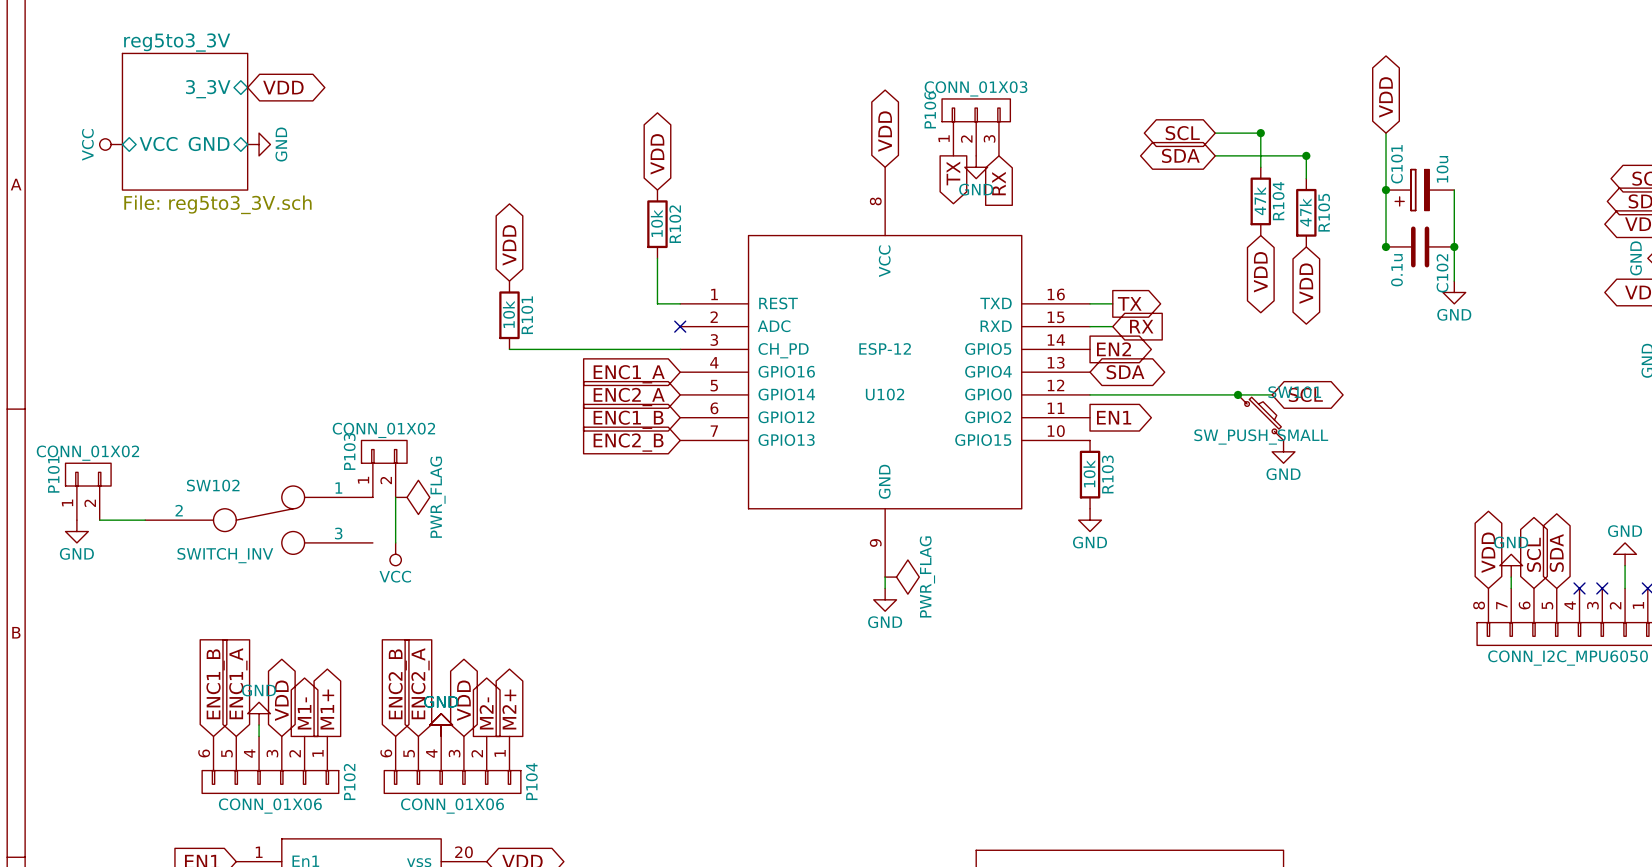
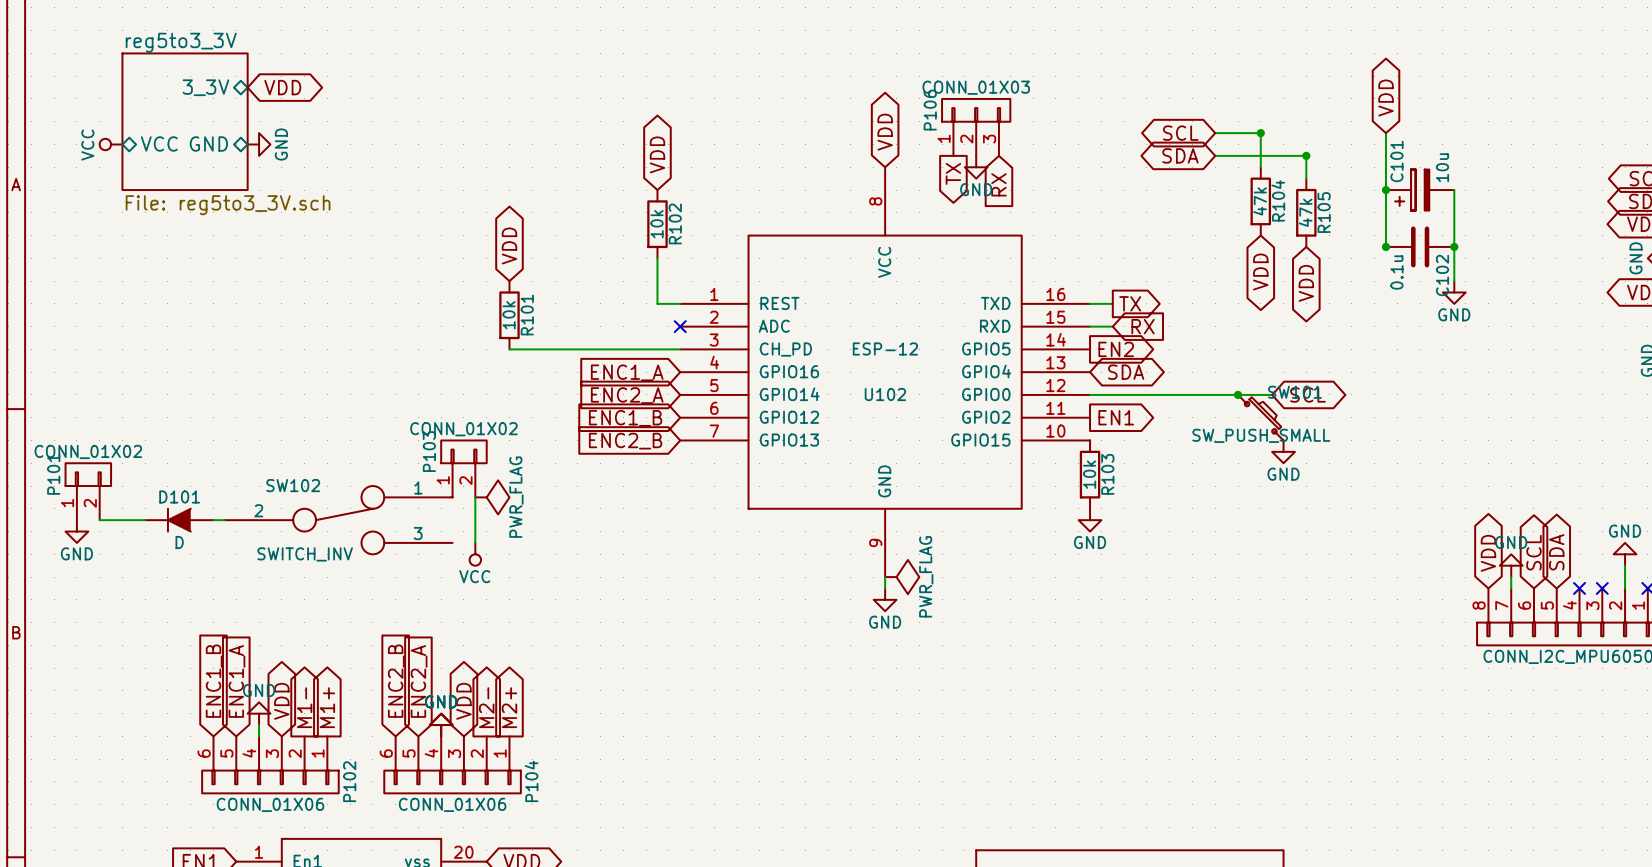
P103 position: (384, 468) -> (463, 468)
wire: (395, 497) (395, 542) -> (475, 497) (475, 542)
power symbol position: PWR_FLAG (412, 497) -> PWR_FLAG (492, 497)
D101: none -> D (179, 520)
wire: none -> (213, 520) (224, 520)
SW102 position: (259, 520) -> (338, 520)
power symbol position: VCC (395, 554) -> VCC (475, 554)

